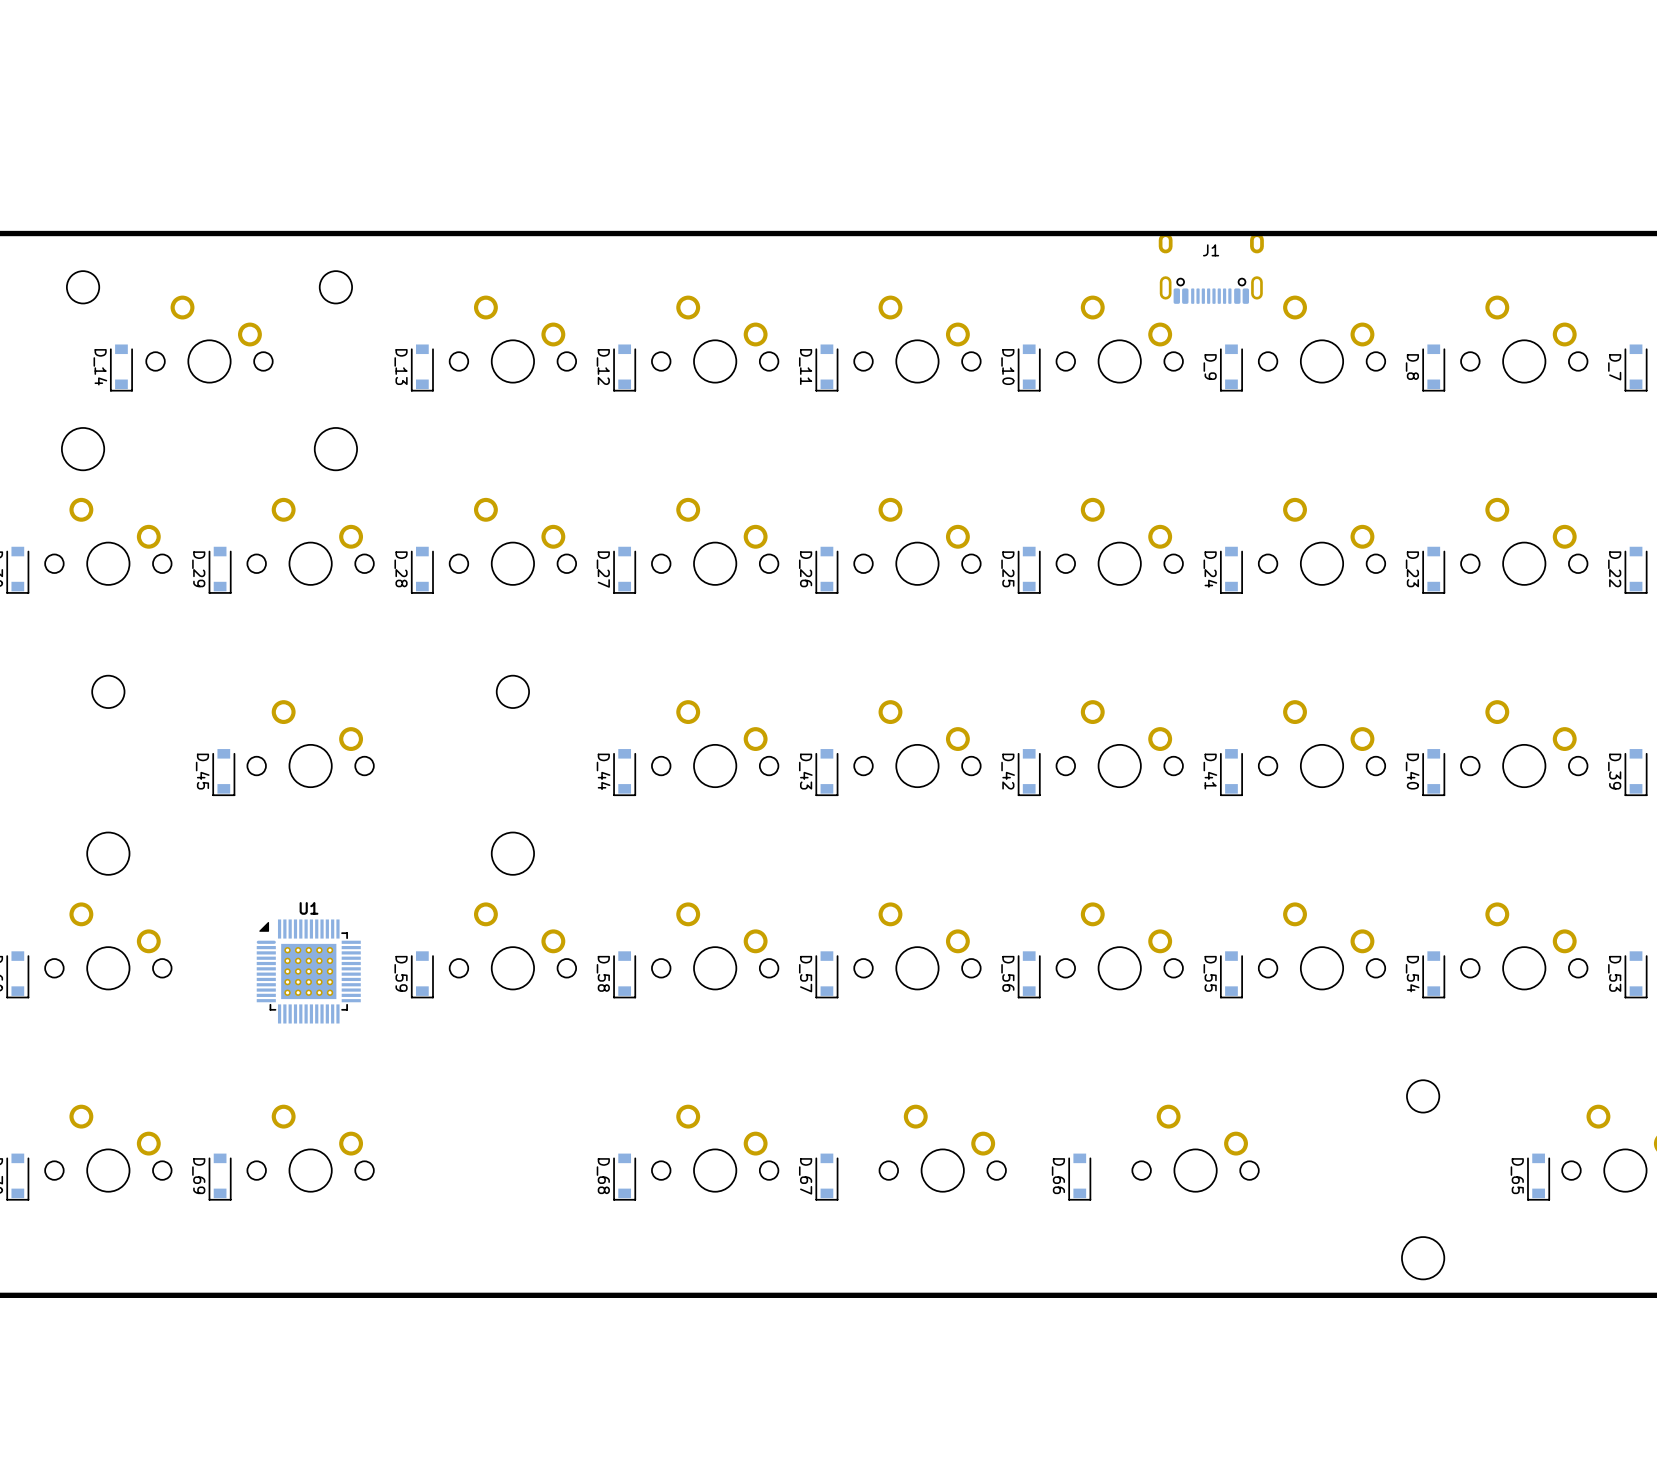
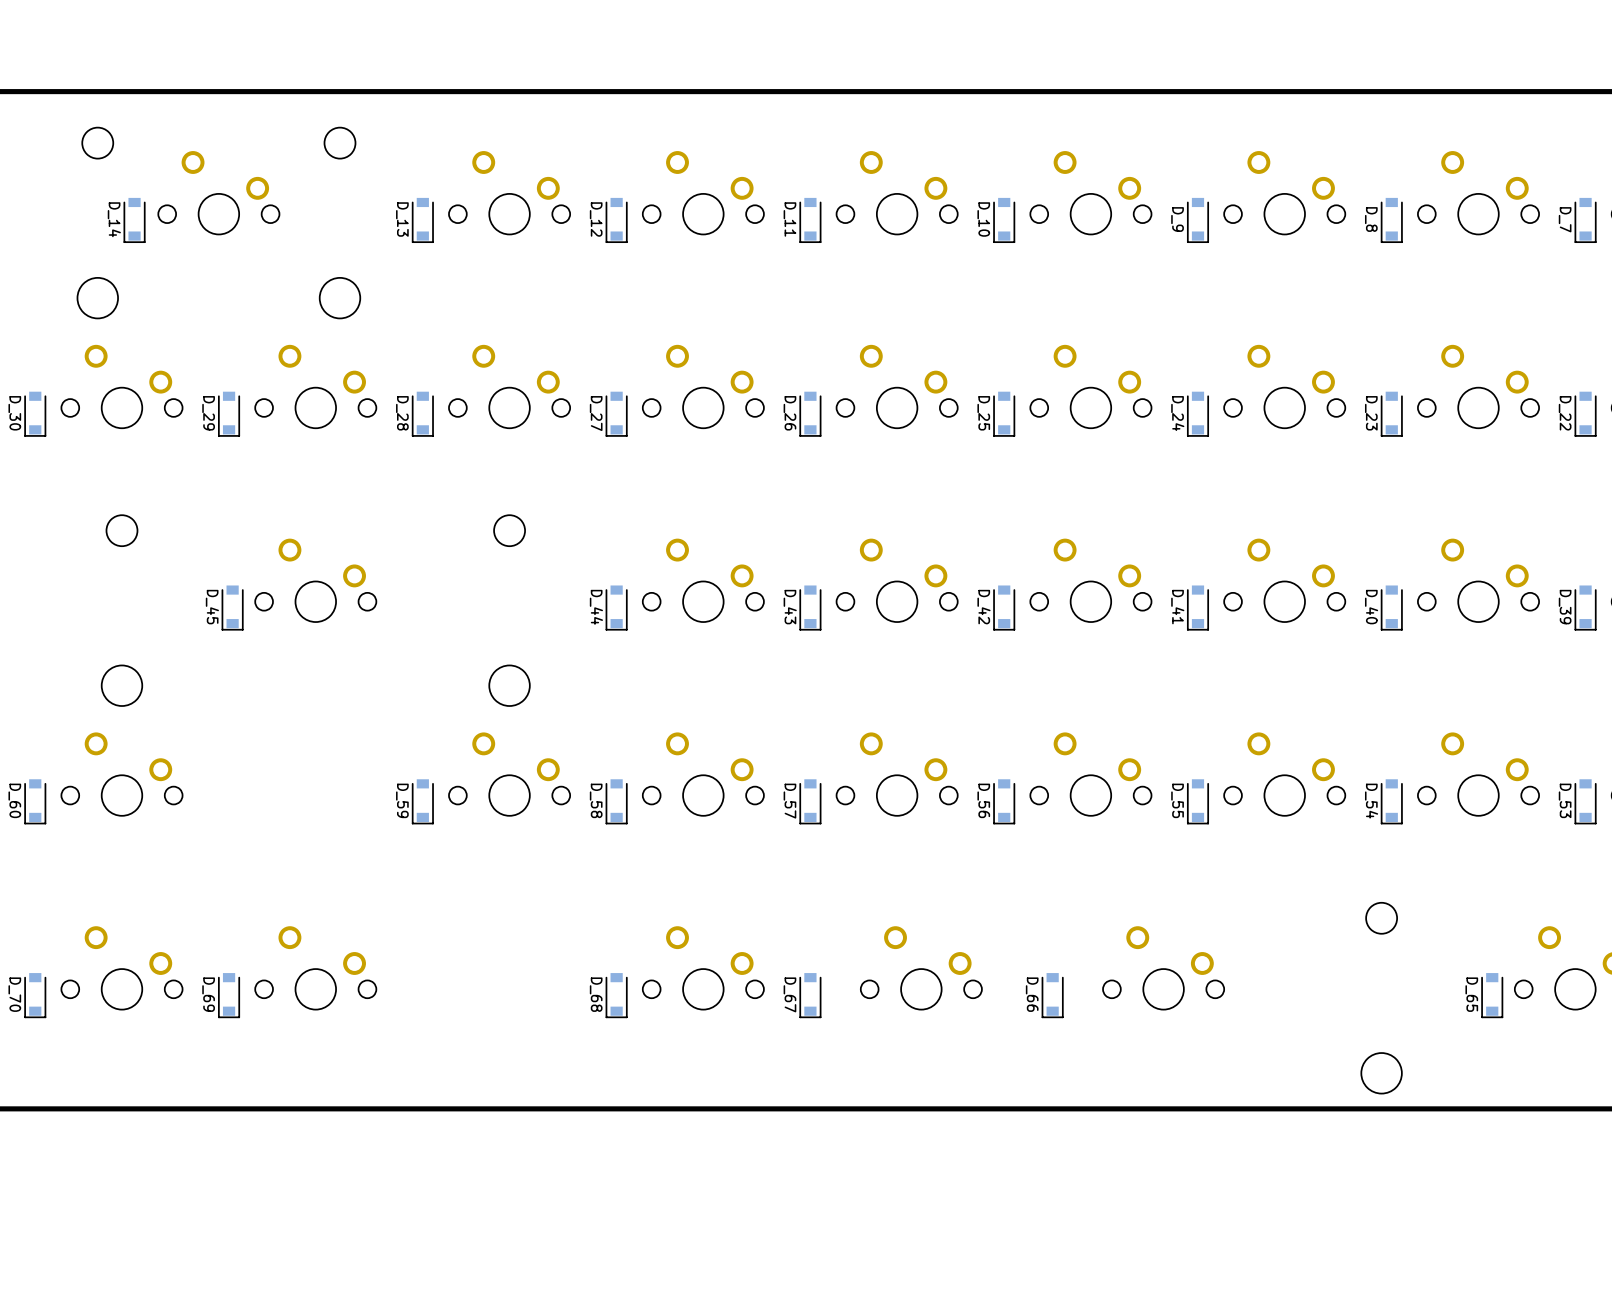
J1: (1211, 268) -> none
U1: (308, 971) -> none

